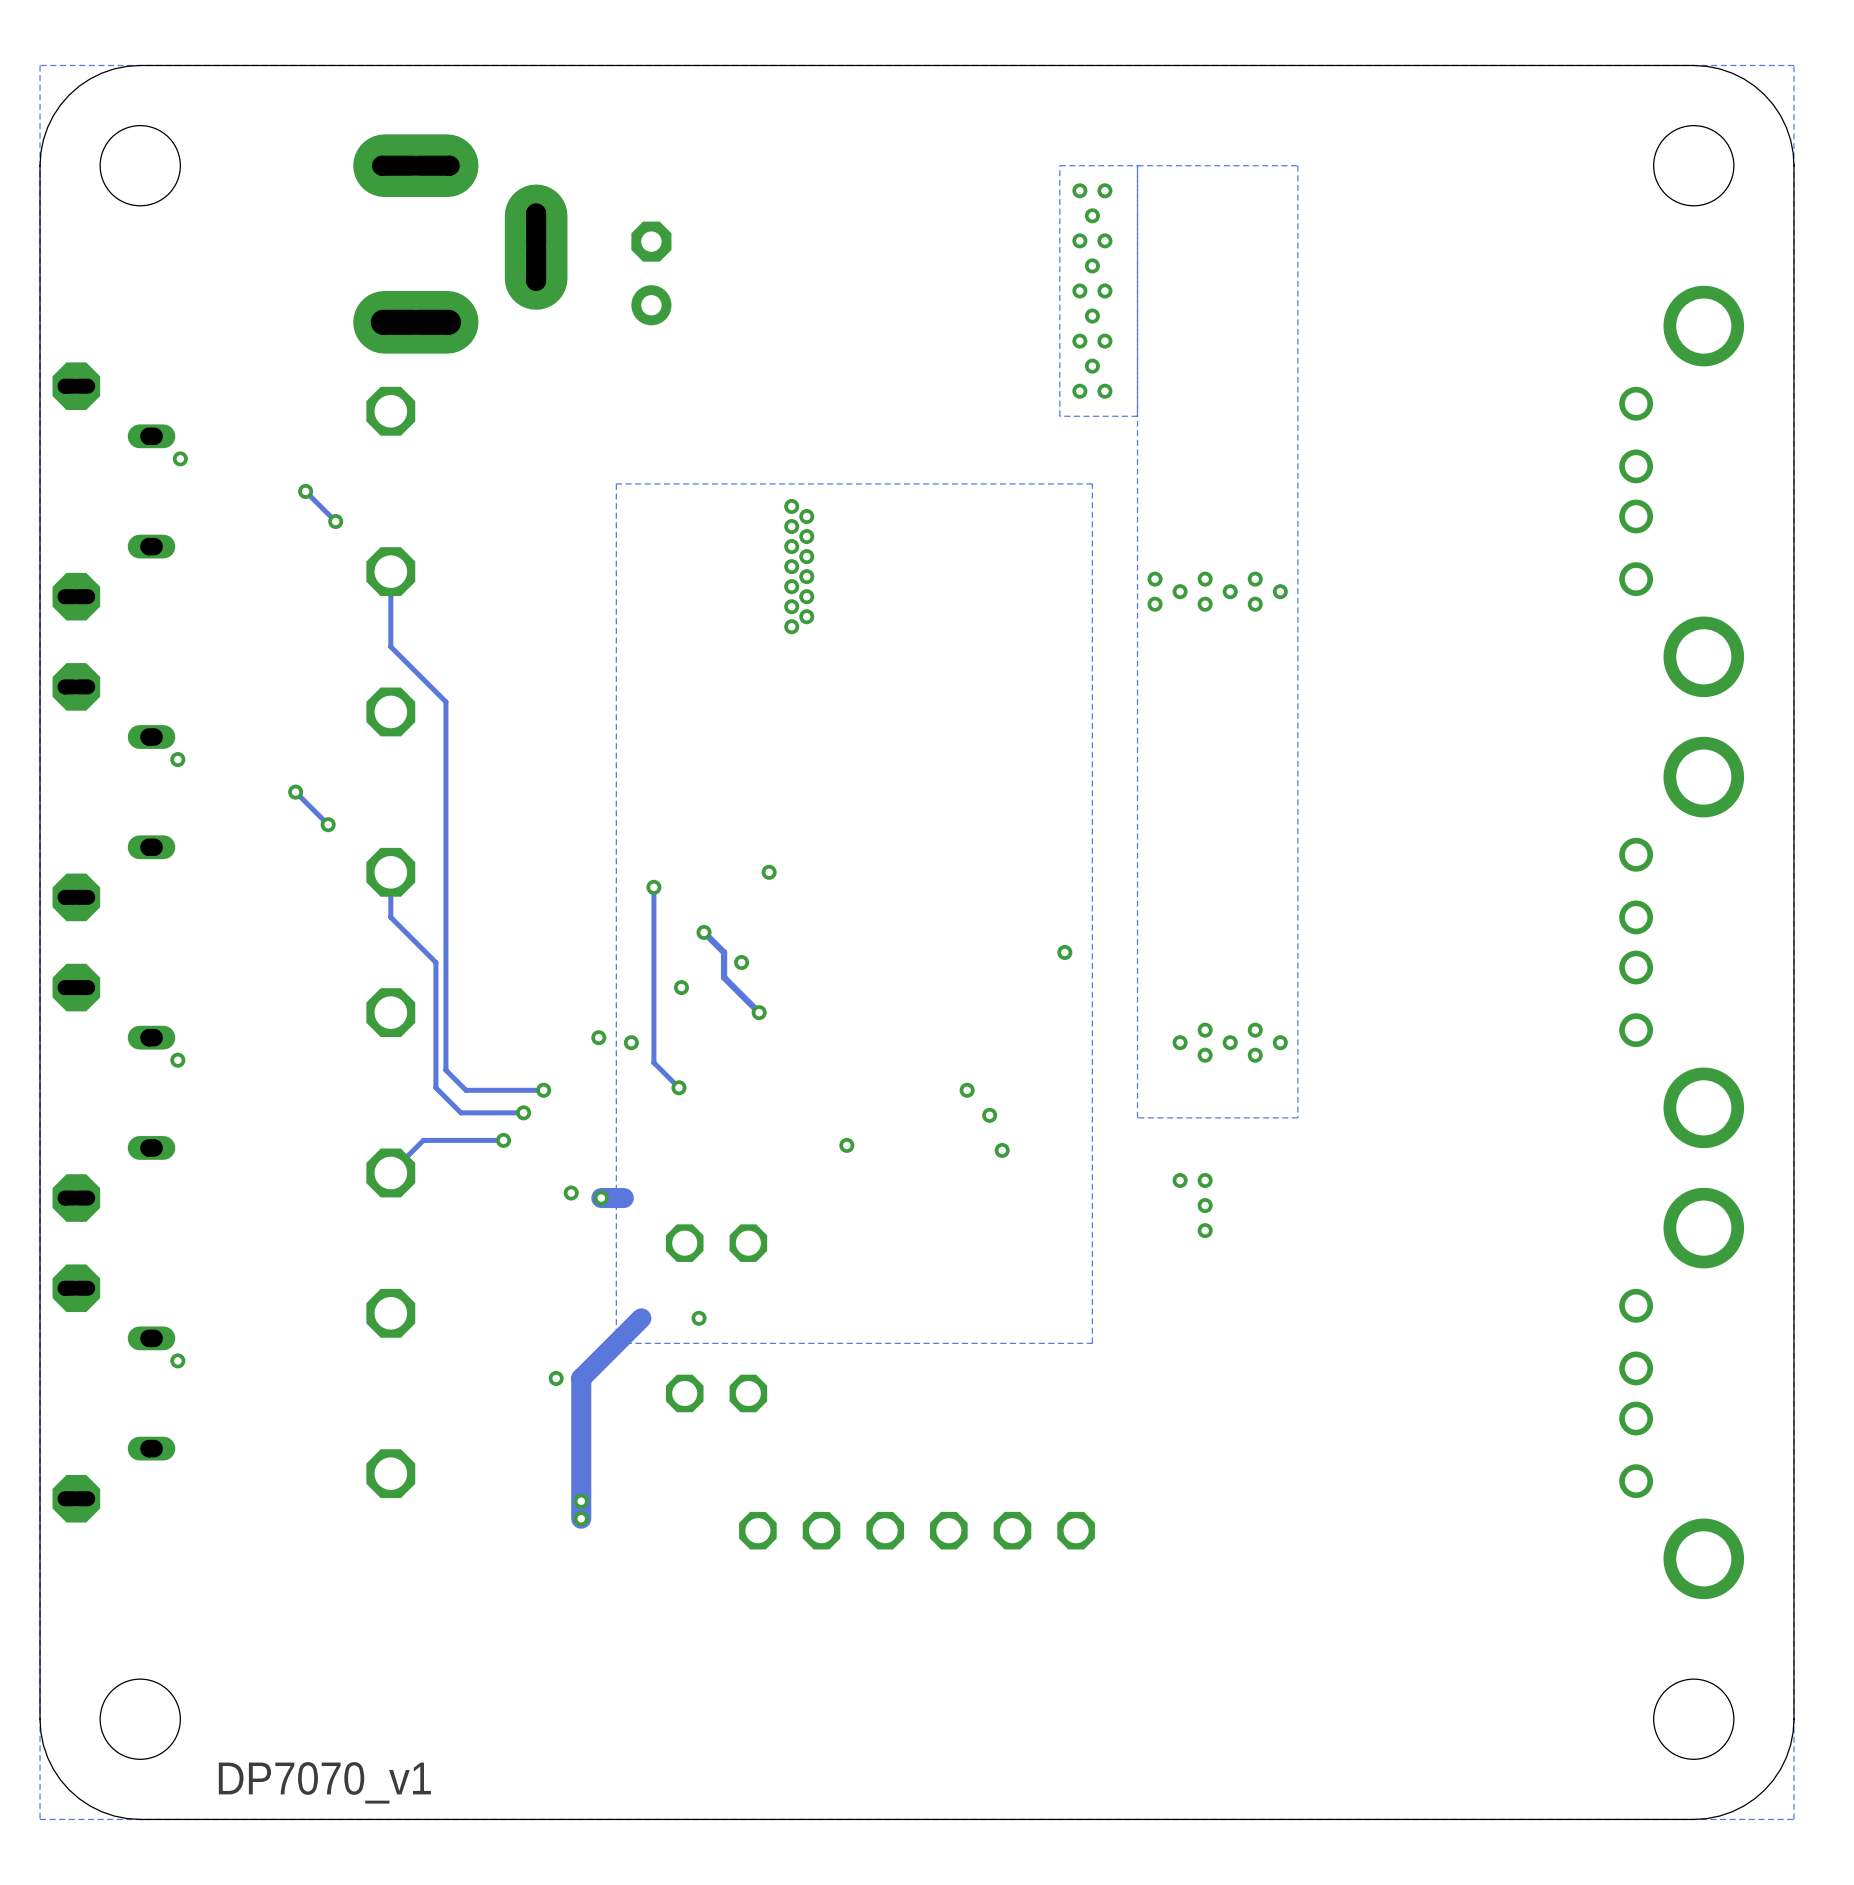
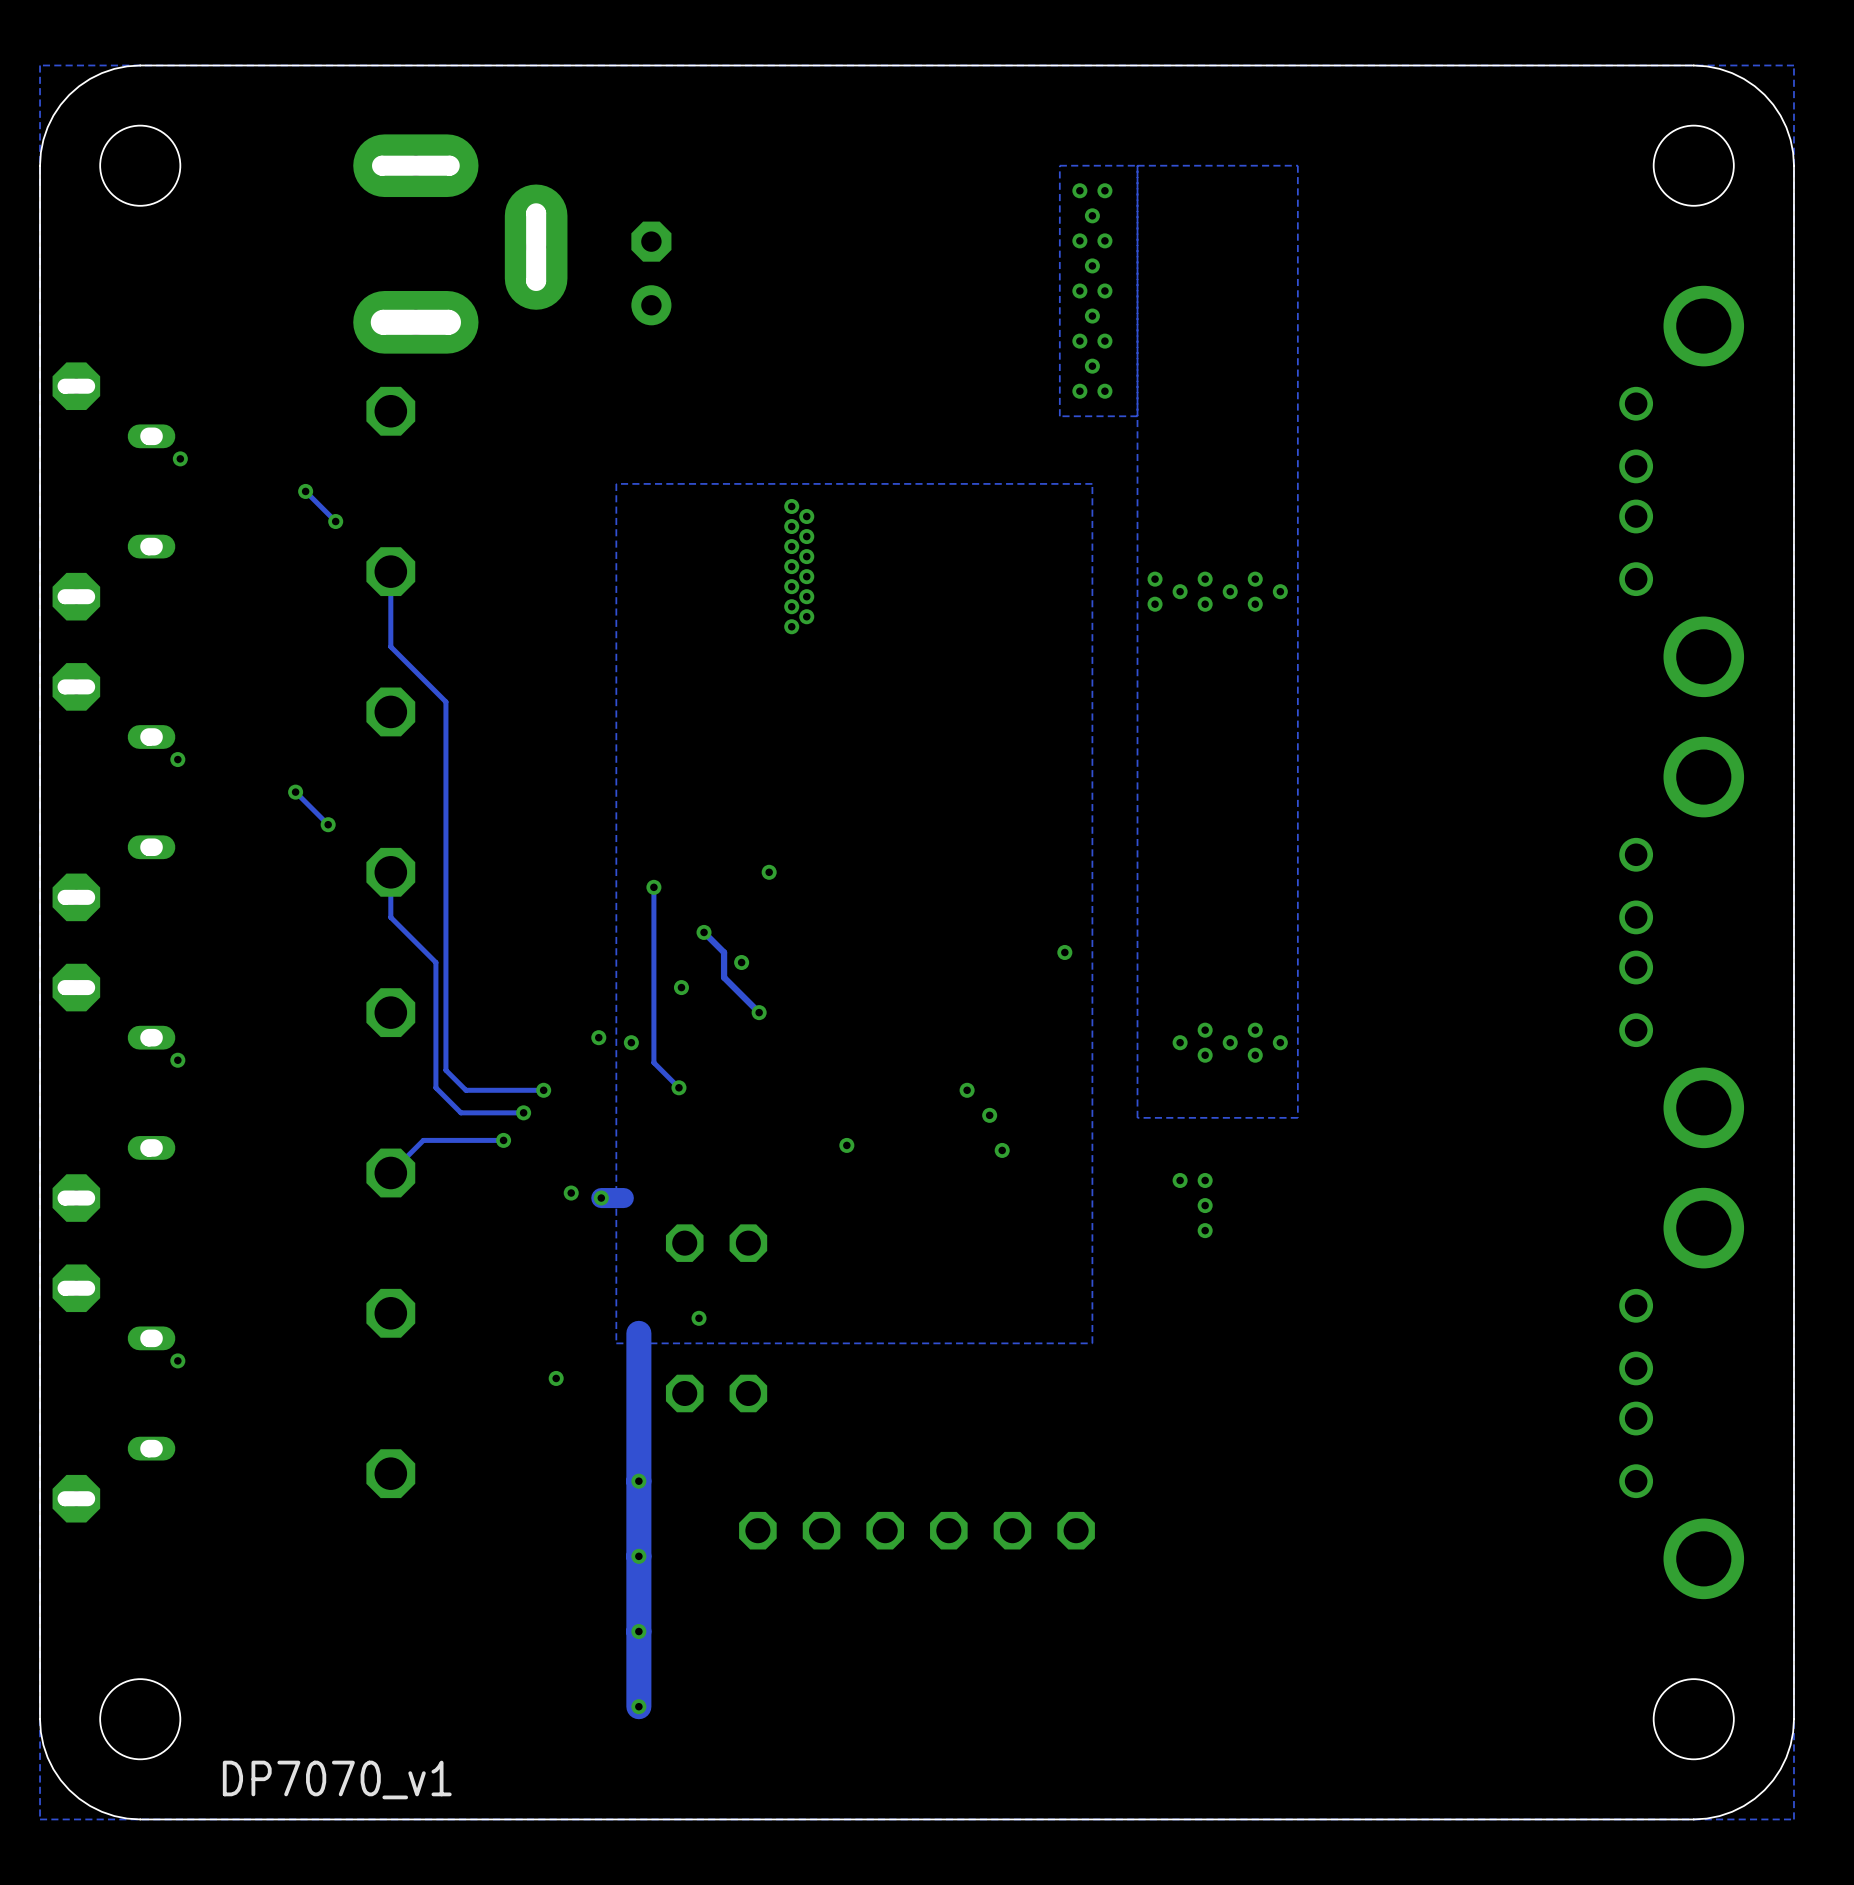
track: (641, 1318) (581, 1378) (581, 1518) -> none
track: none -> (638, 1333) (638, 1706)
via: none -> (638, 1481)
via: (581, 1501) -> none
via: (581, 1518) -> none
via: none -> (638, 1556)
via: none -> (638, 1631)
via: none -> (638, 1706)

